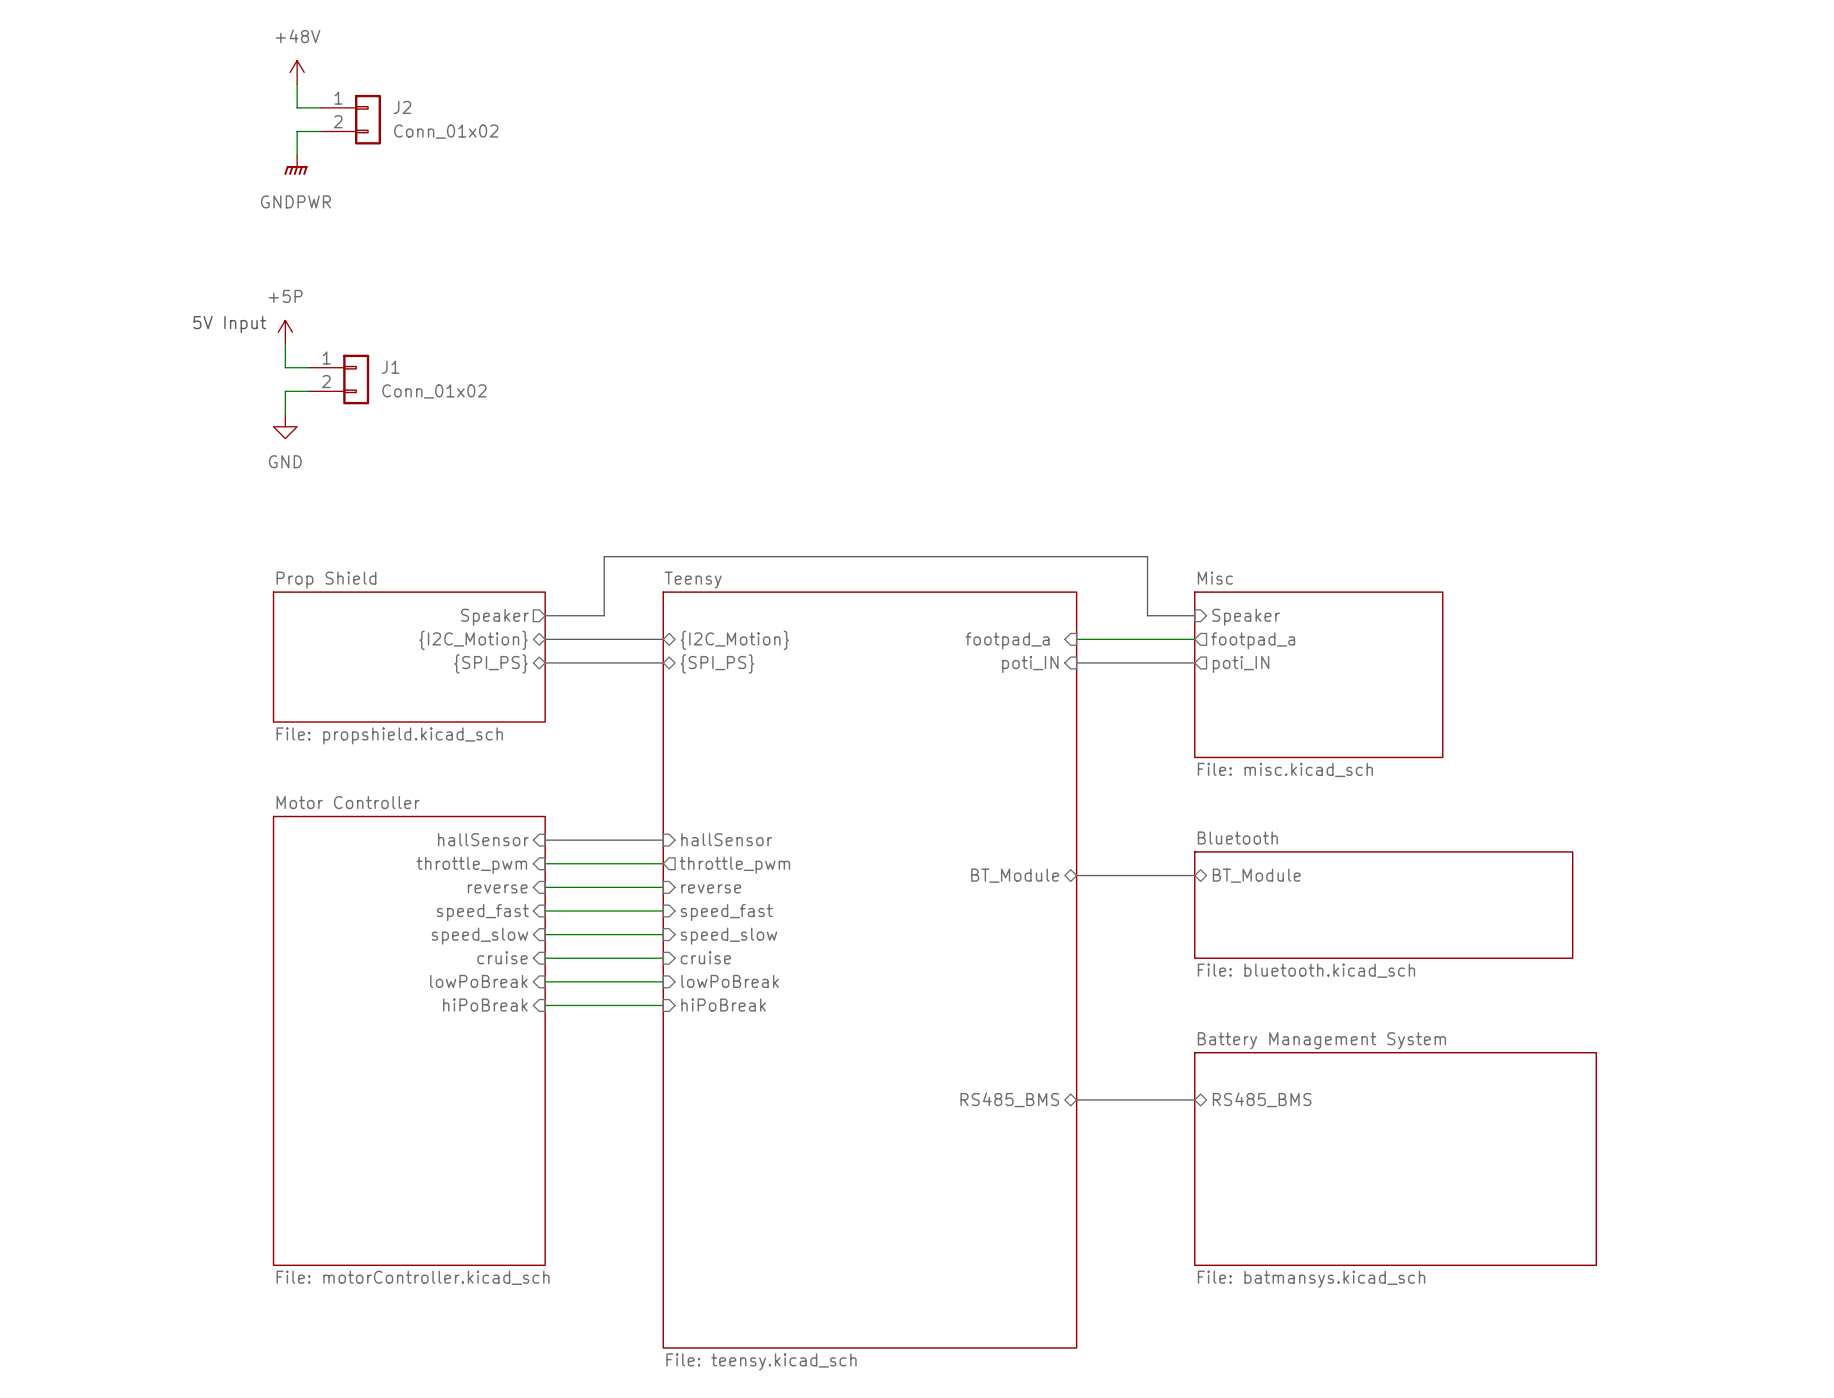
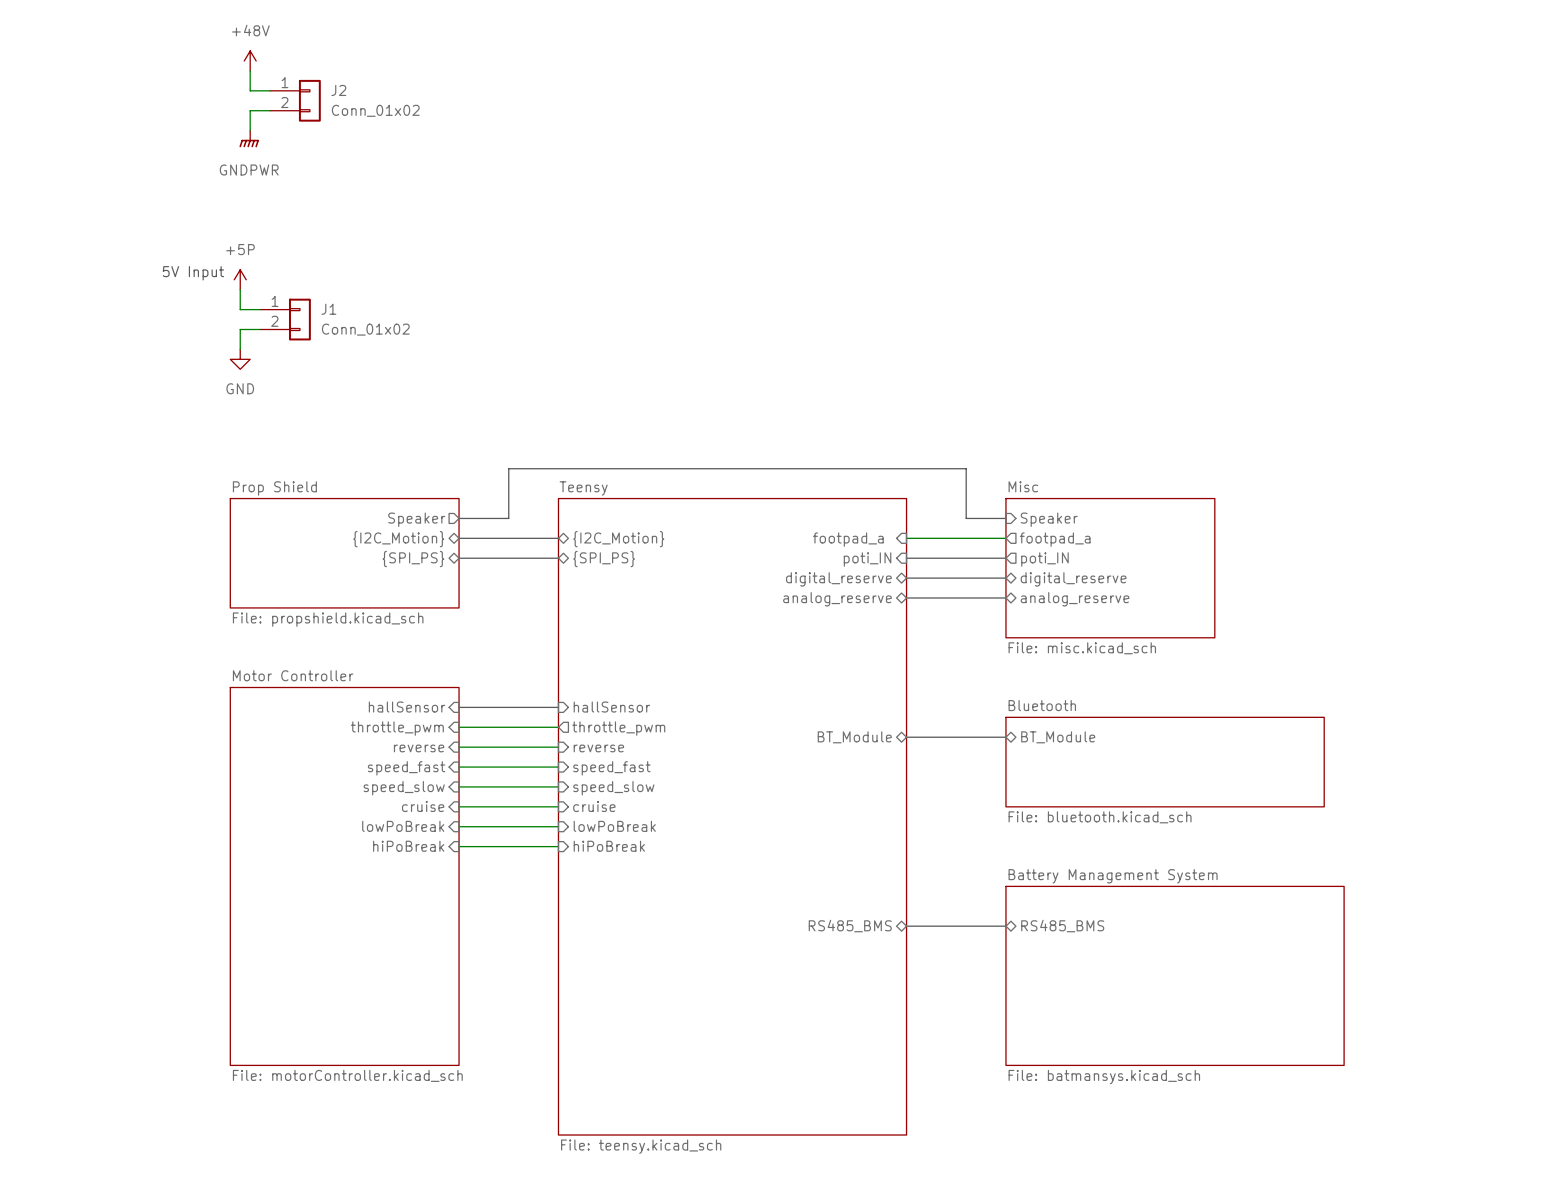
bus: none -> (906, 578) (1005, 578)
sheet pin: none -> digital_reserve (838, 579)
sheet pin: none -> digital_reserve (1073, 579)
bus: none -> (906, 598) (1005, 598)
sheet pin: none -> analog_reserve (837, 599)
sheet pin: none -> analog_reserve (1075, 599)

